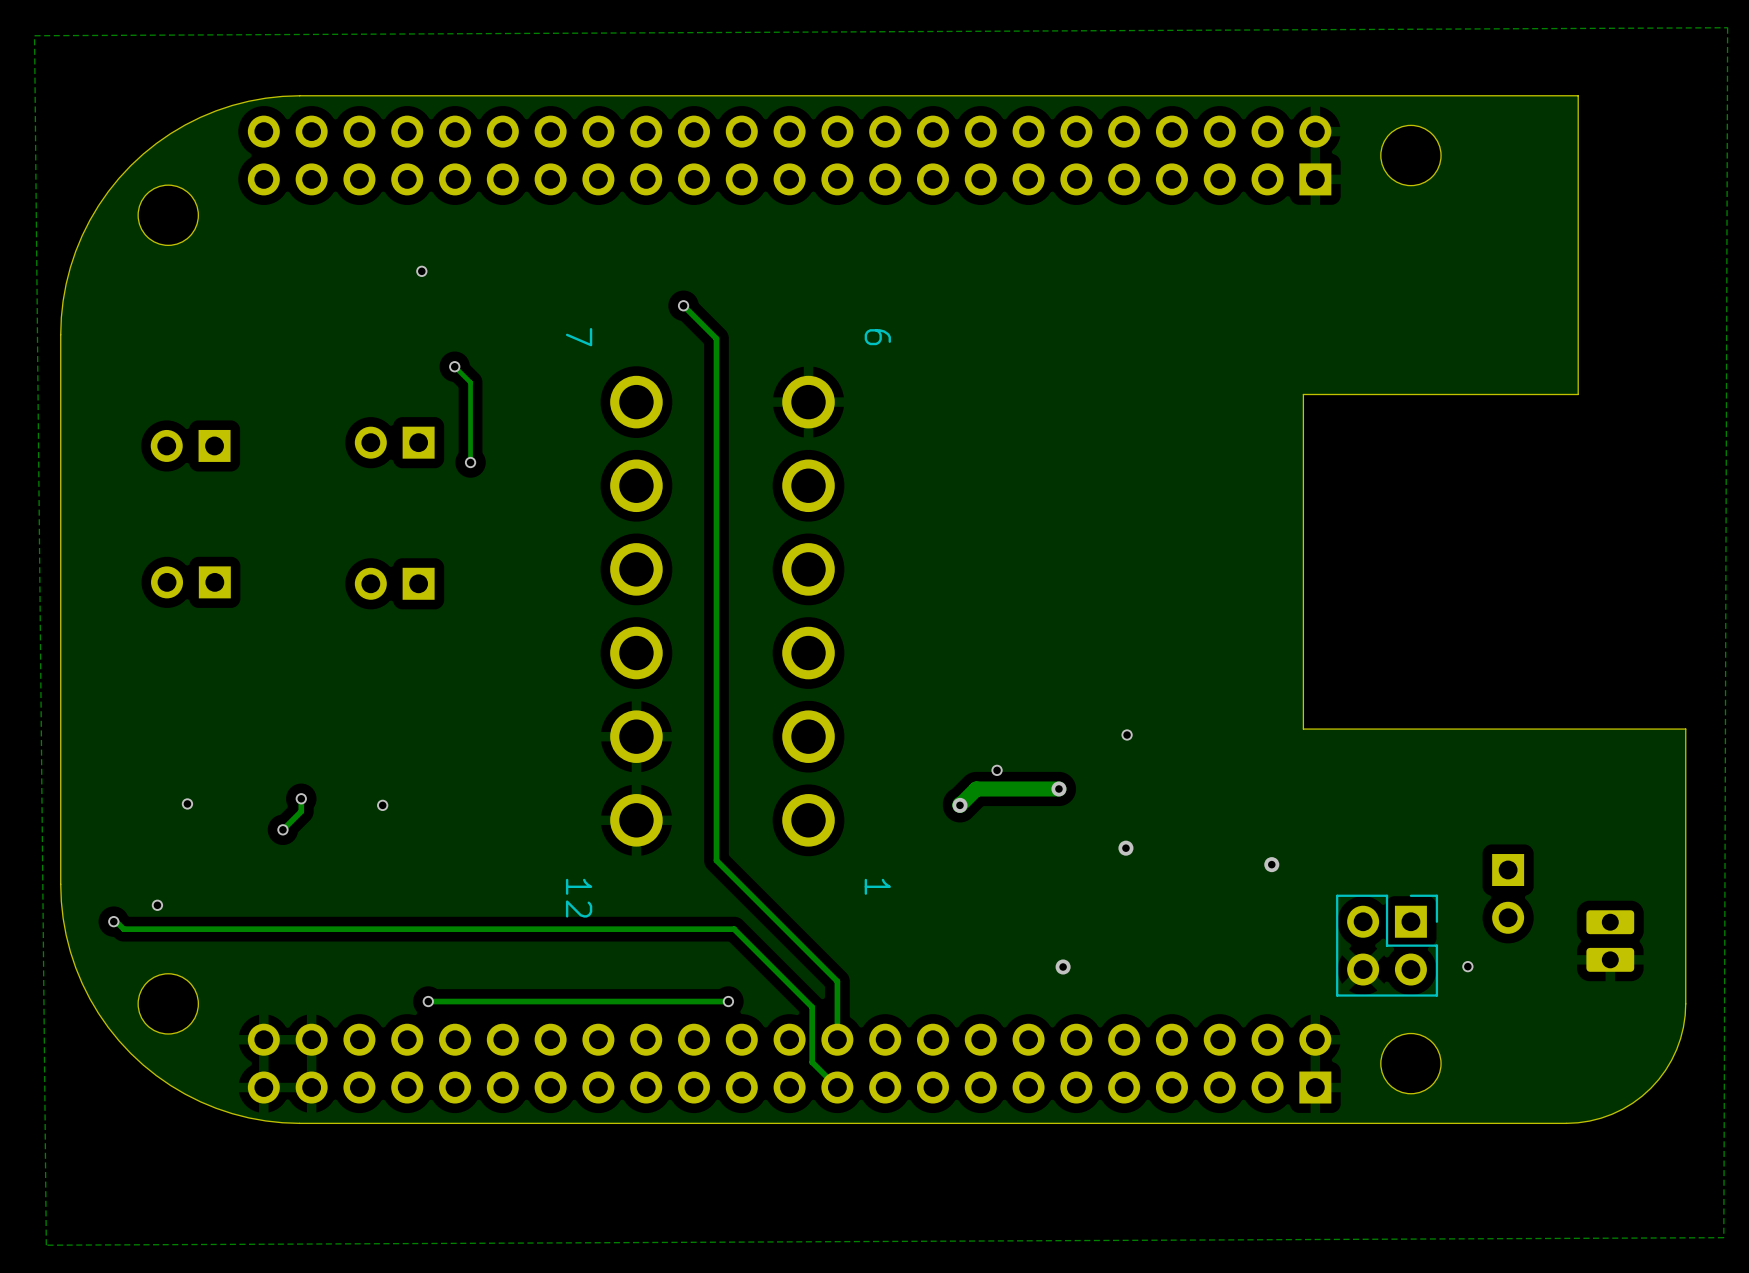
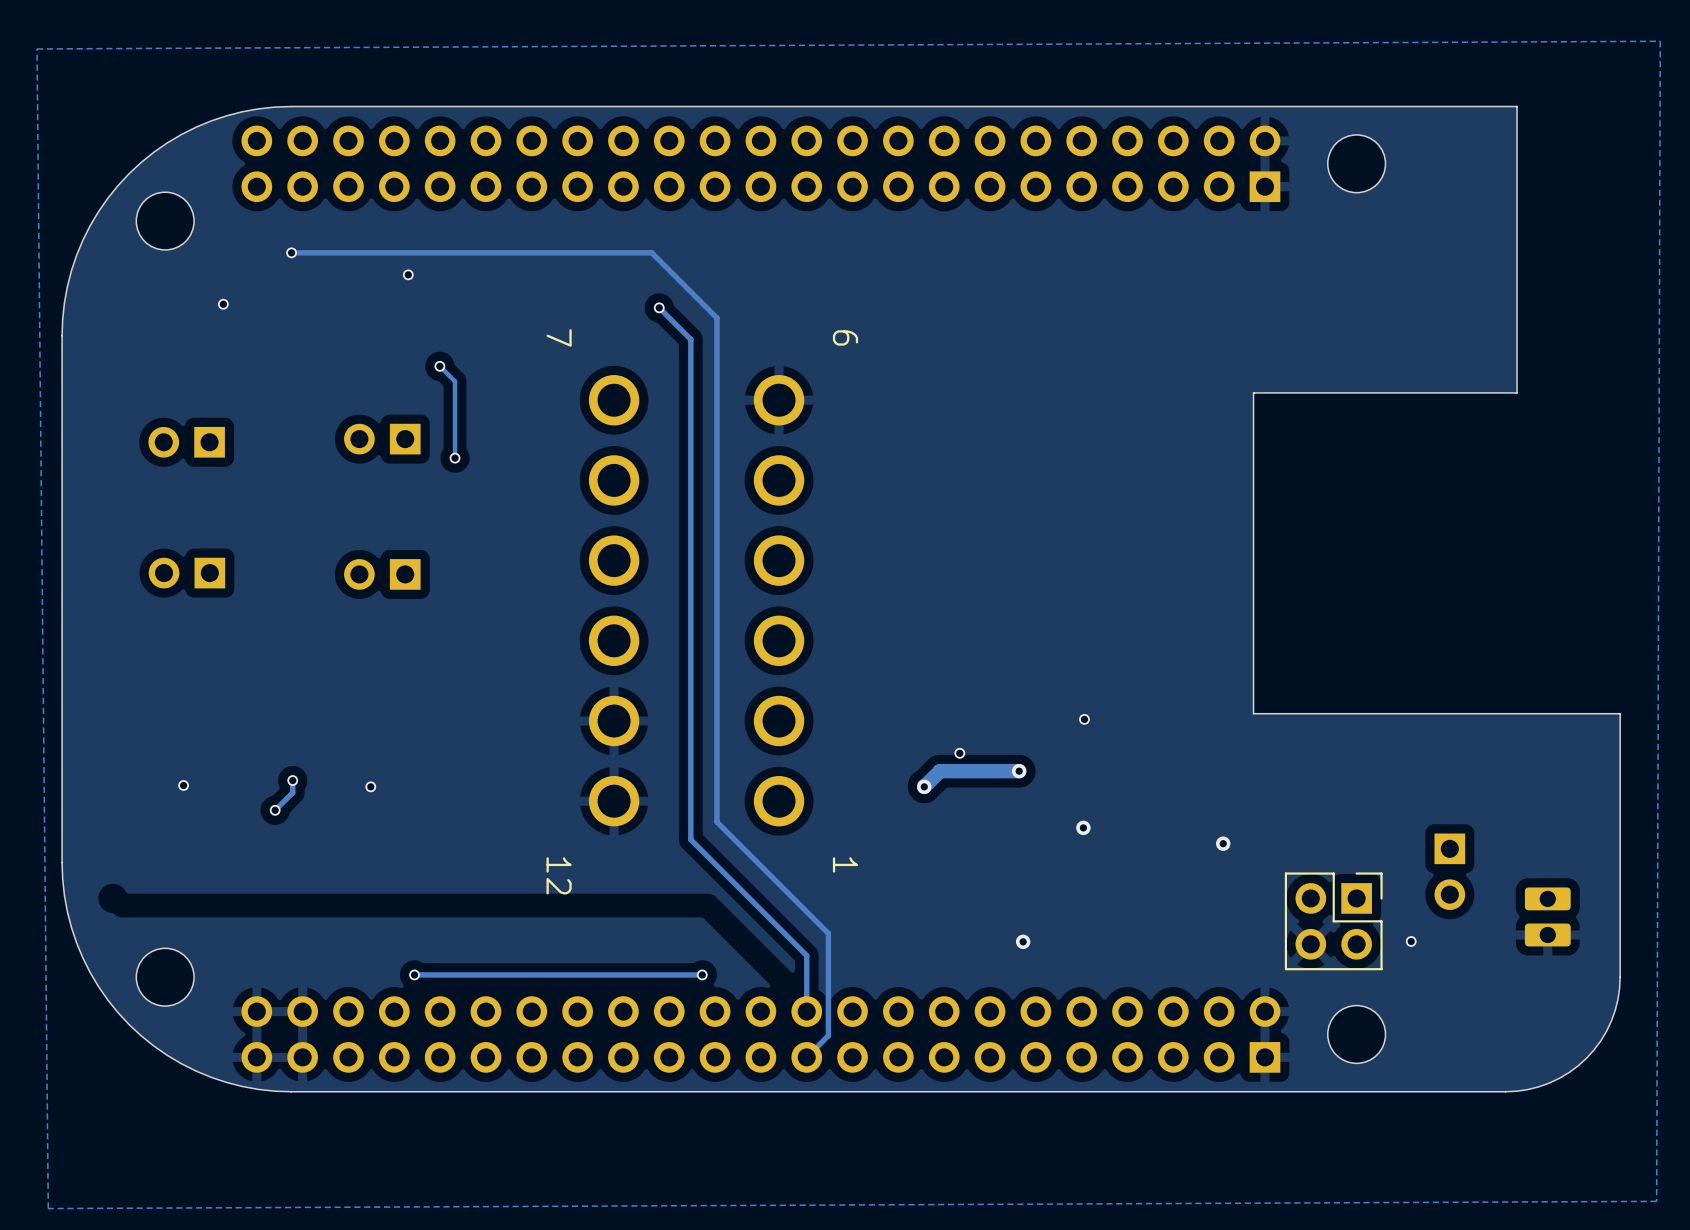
via: none -> (291, 252)
via: none -> (223, 304)
via: (157, 905) -> none
via: (113, 921) -> none
track: (115, 923) (113, 921) (123, 929) (734, 929) (812, 1007) (812, 1062) (837, 1087) -> (291, 252) (651, 252) (716, 317) (716, 822) (828, 933) (828, 1035) (806, 1057)

